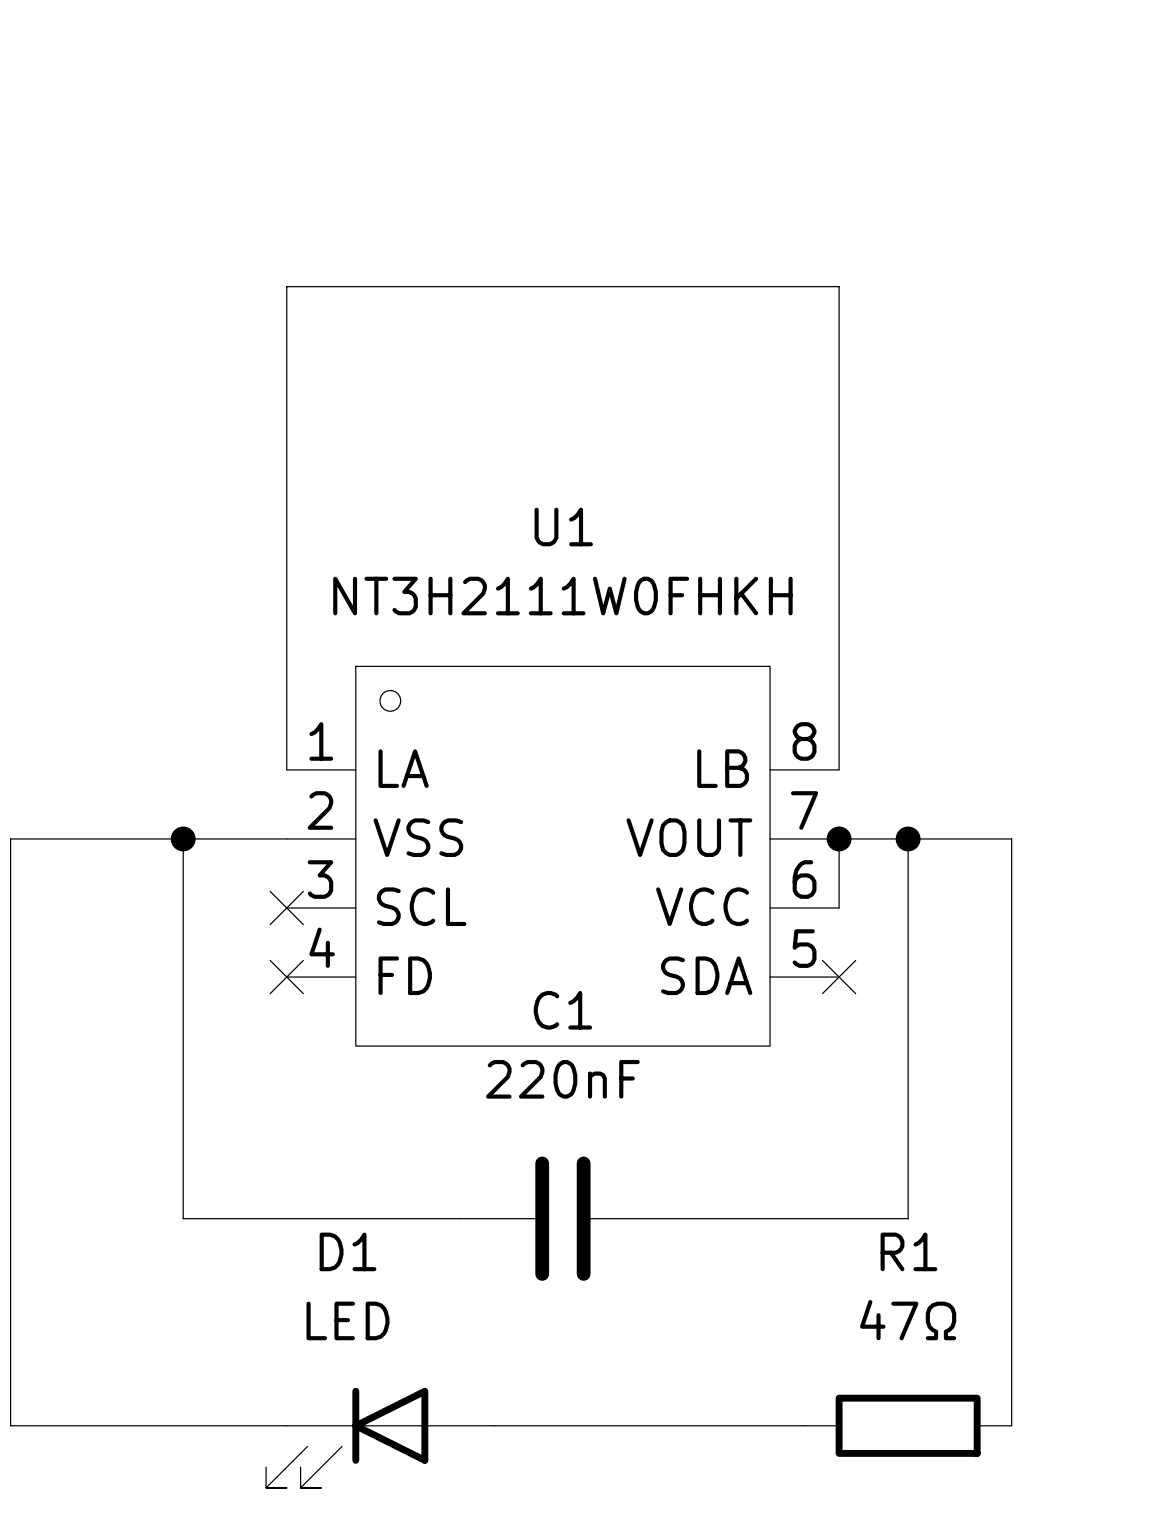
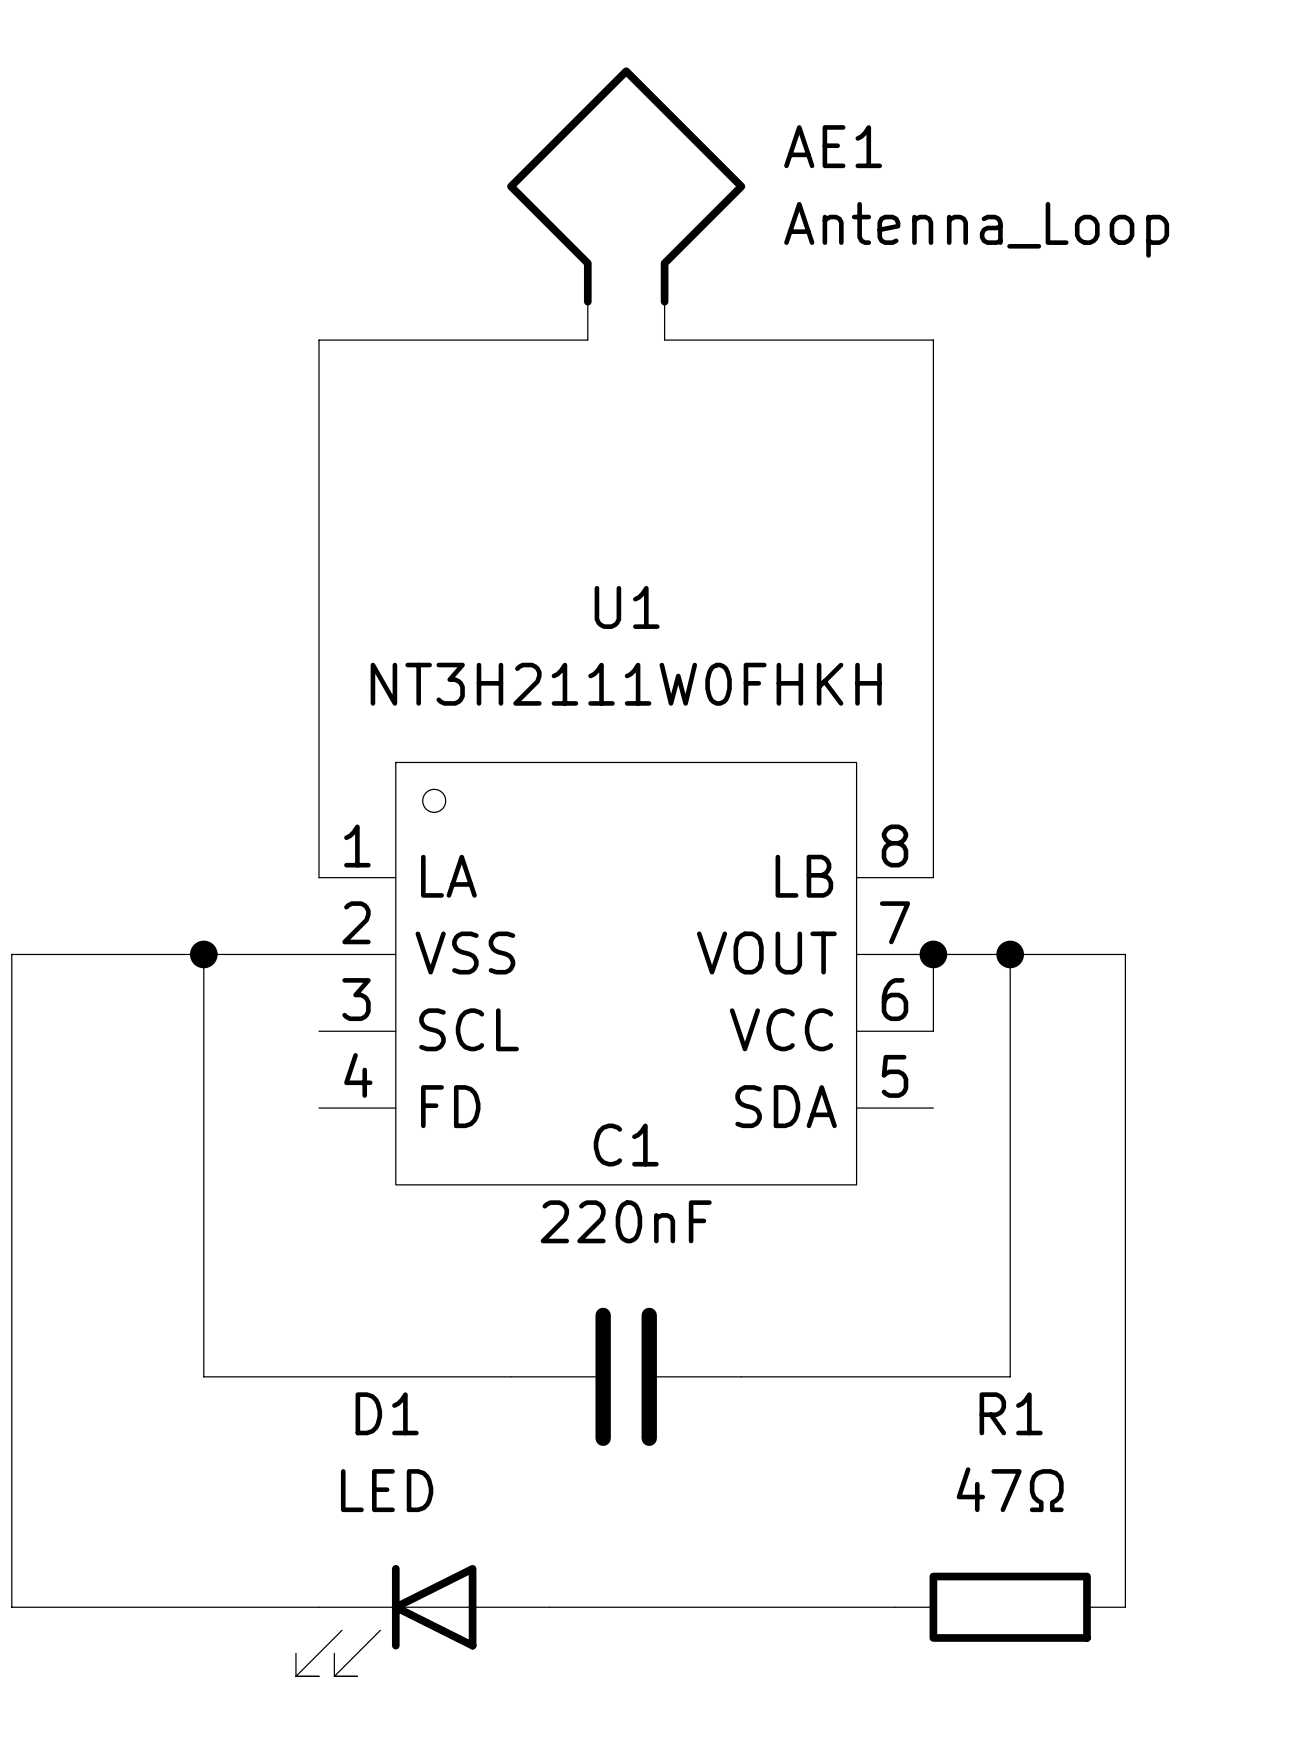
AE1: none -> Antenna_Loop (626, 203)
wire: (528, 286) (597, 286) -> none
no-connect mark: (286, 908) -> none
no-connect mark: (286, 977) -> none
no-connect mark: (839, 977) -> none

